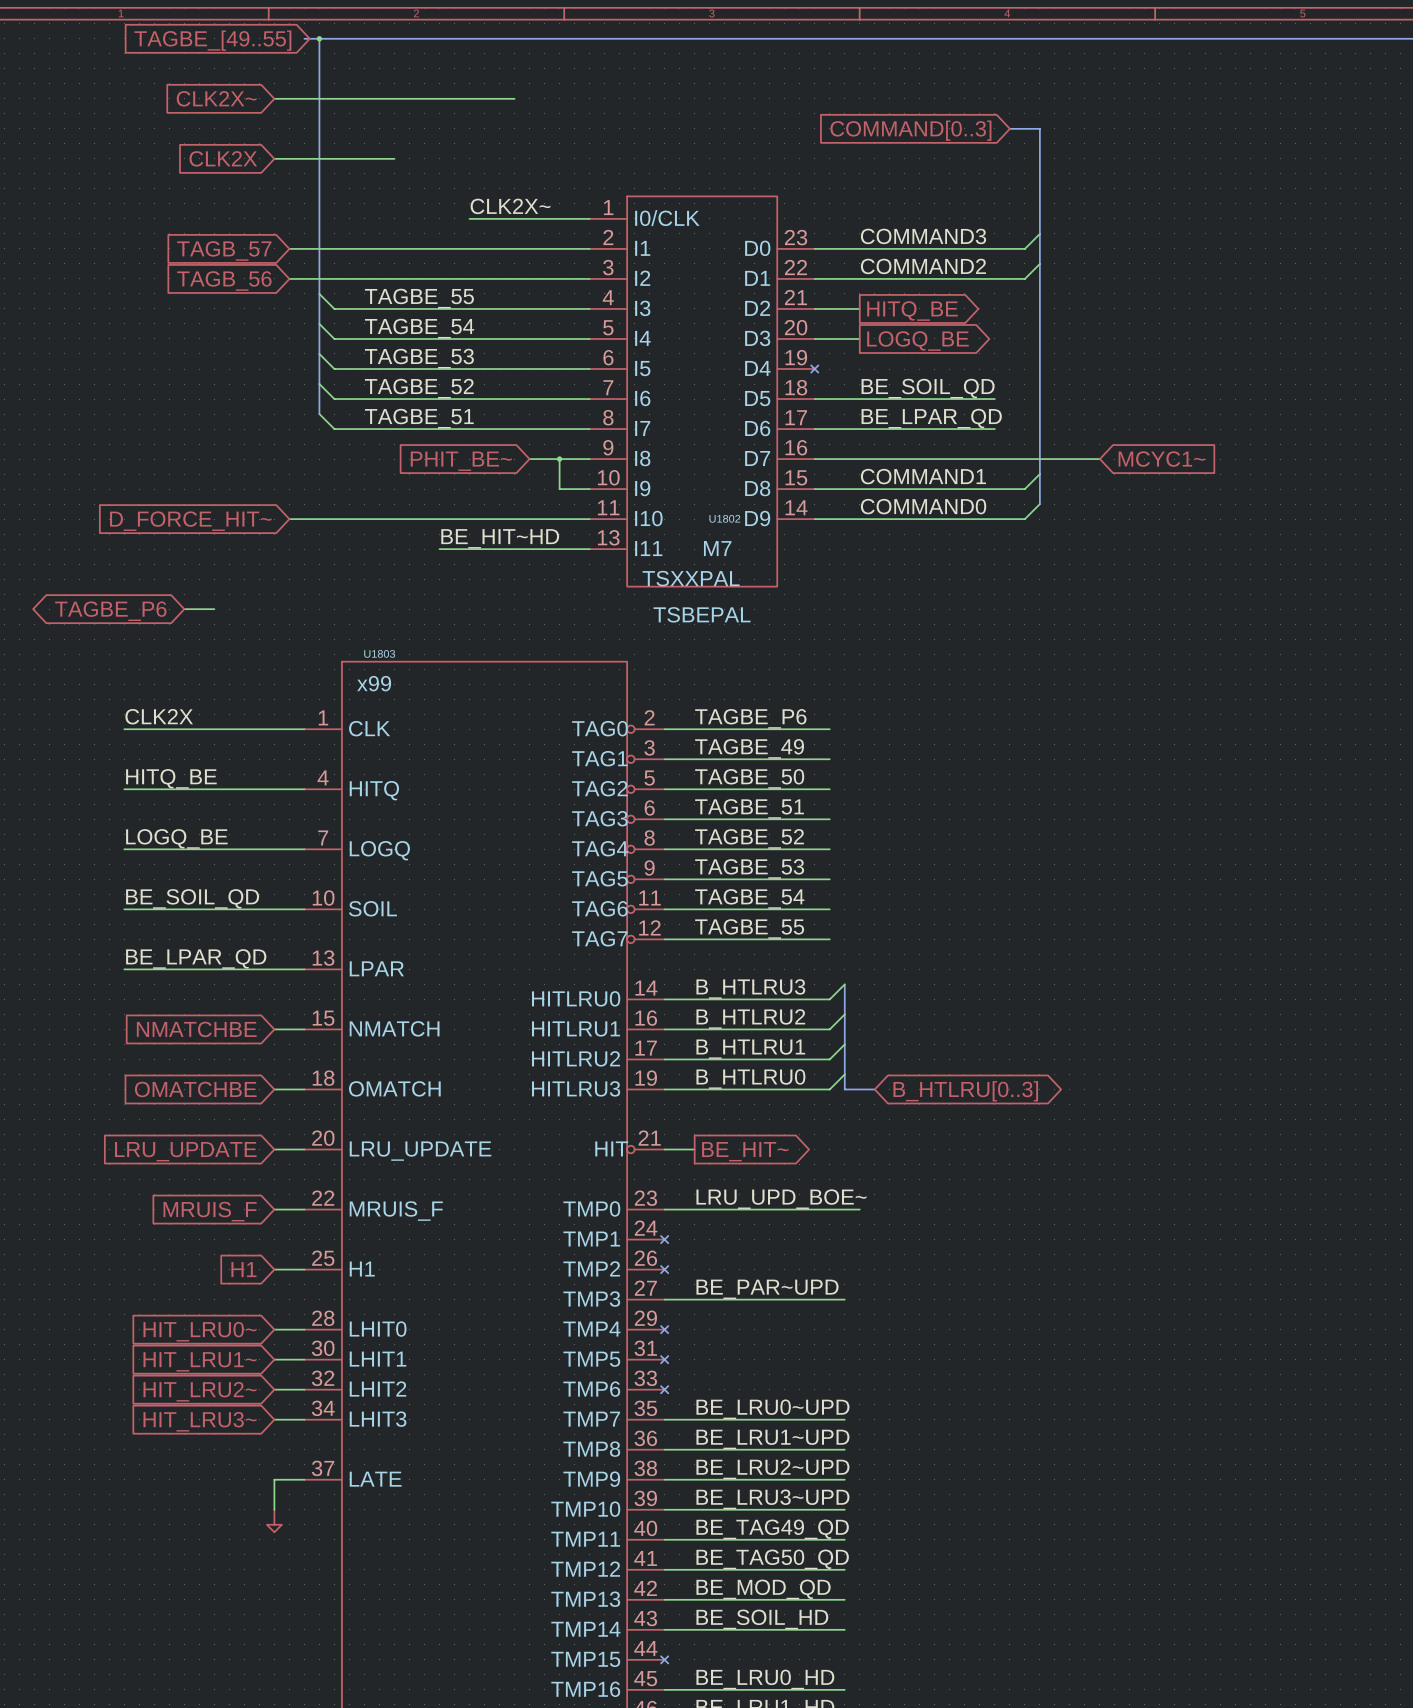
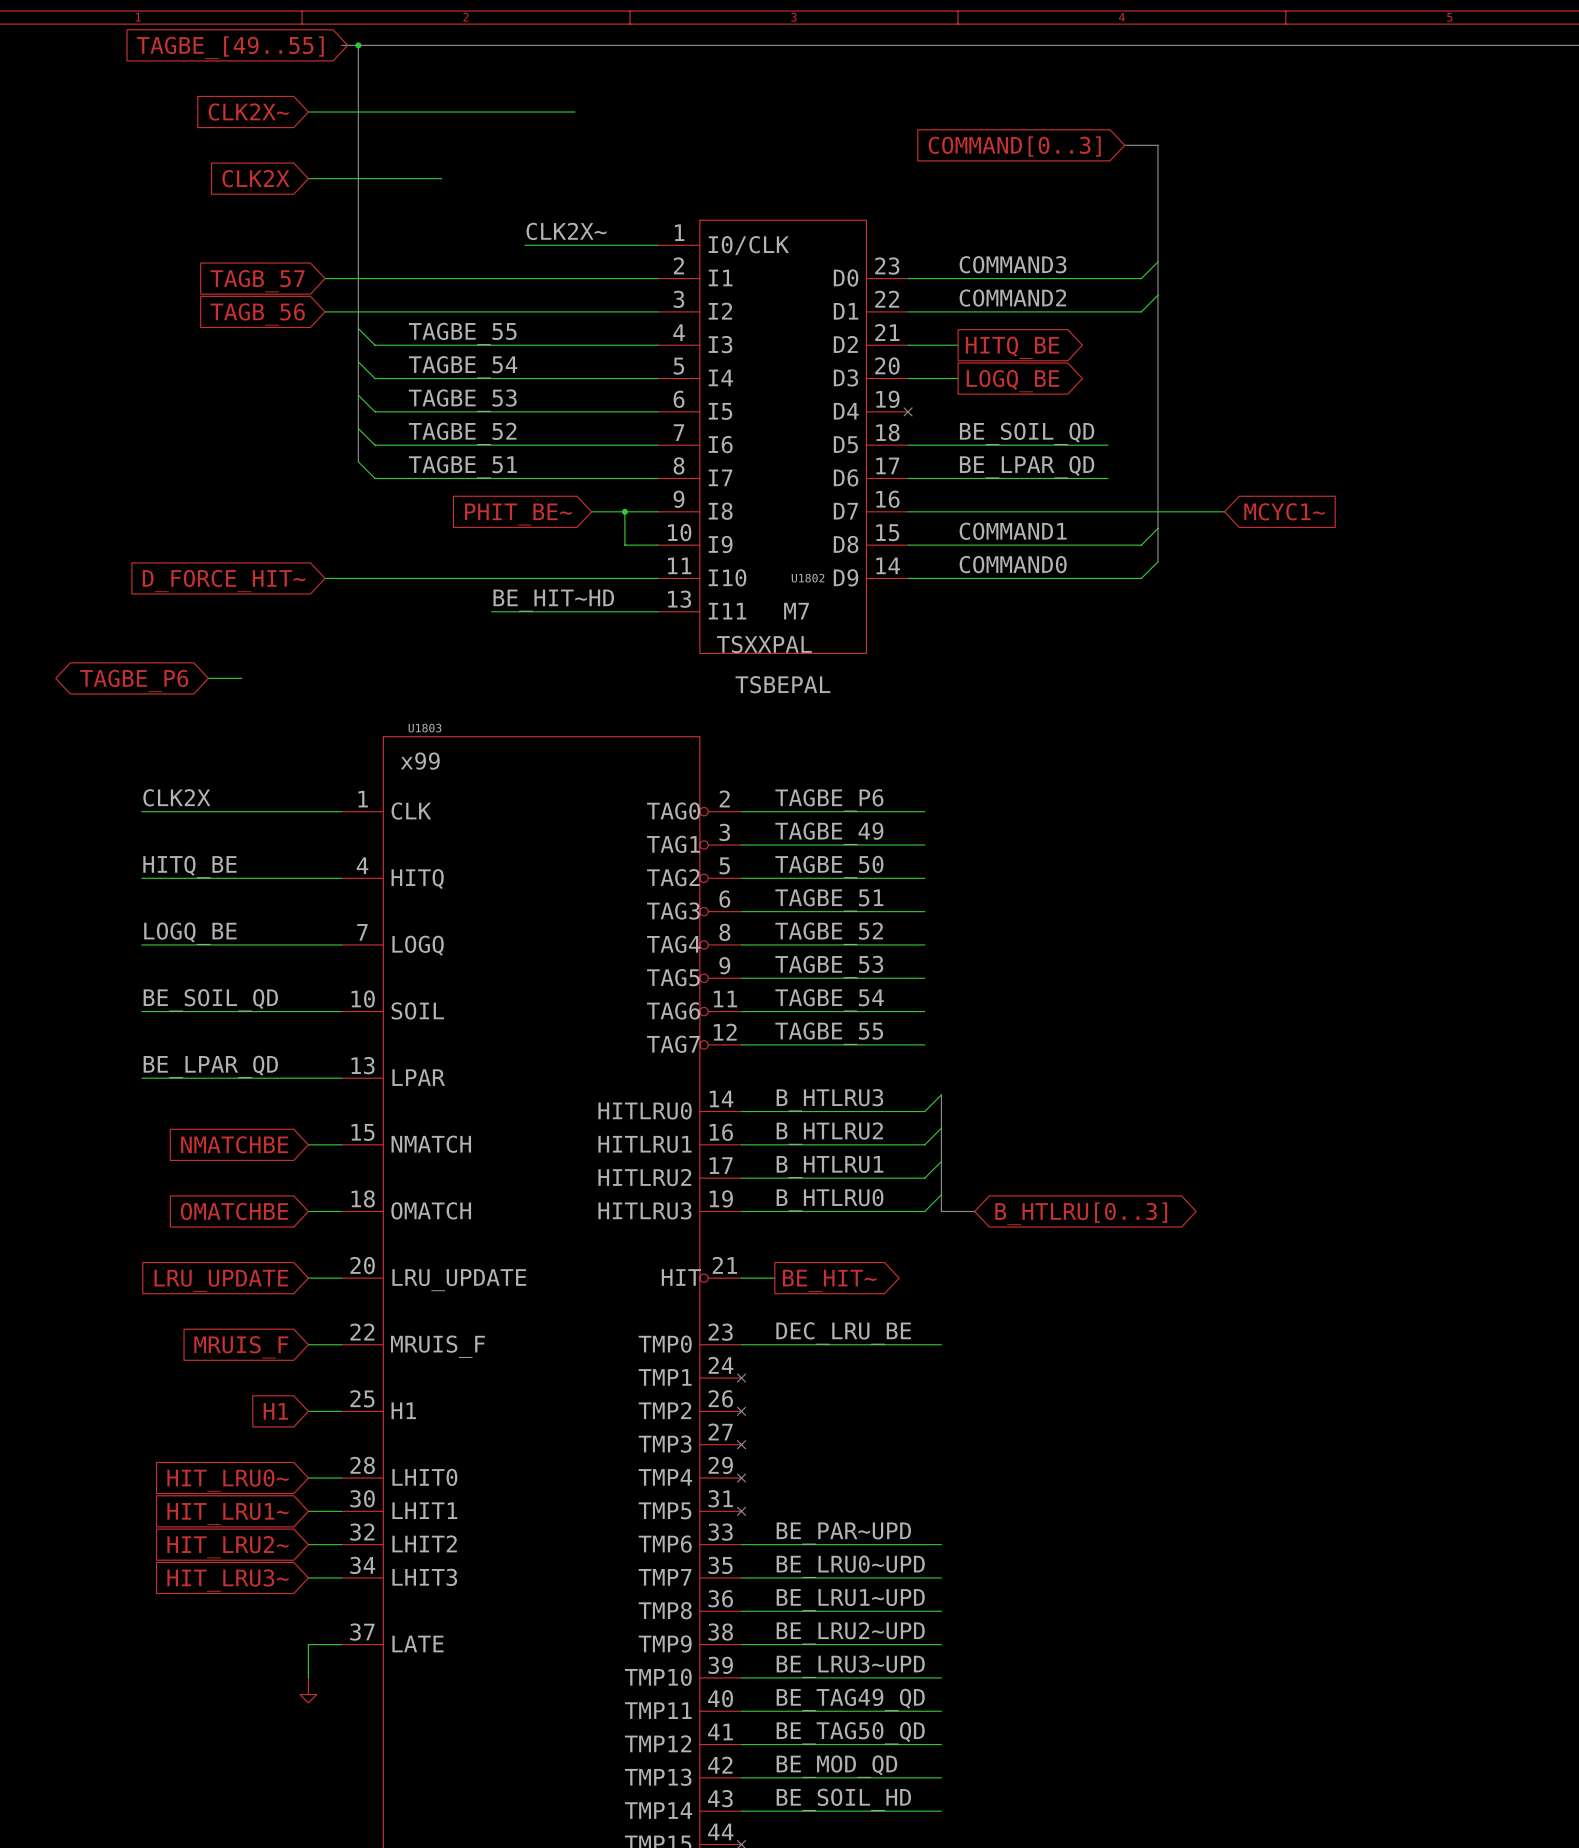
label: LRU_UPD_BOE~ (781, 1199) -> DEC_LRU_BE (843, 1333)
wire: (844, 1209) (859, 1209) -> none
label position: BE_PAR~UPD (767, 1289) -> BE_PAR~UPD (843, 1533)
wire: (664, 1299) (844, 1299) -> (741, 1544) (941, 1544)
no-connect mark: none -> (741, 1444)
no-connect mark: (664, 1389) -> none

